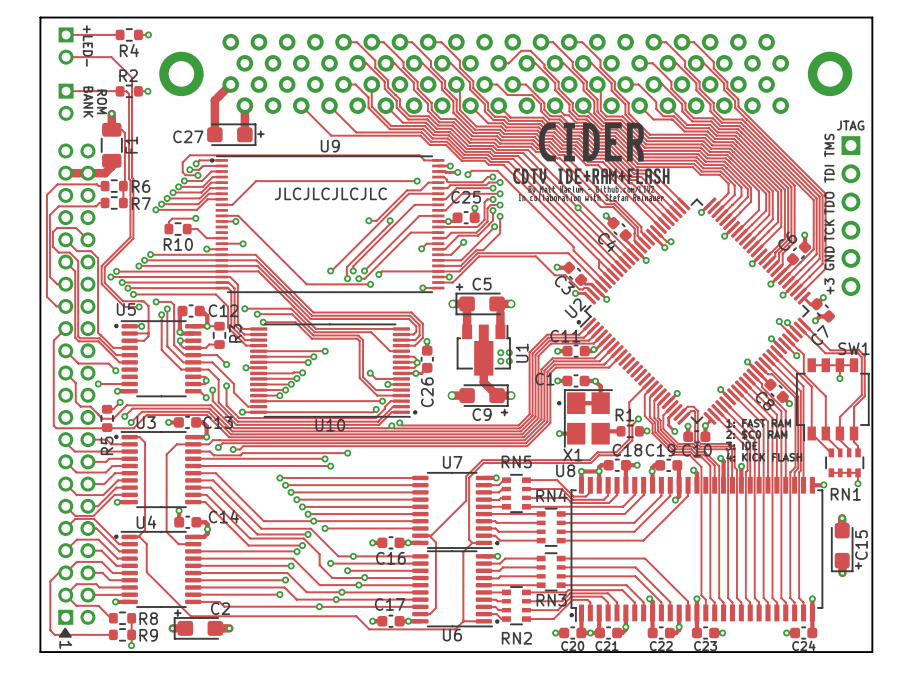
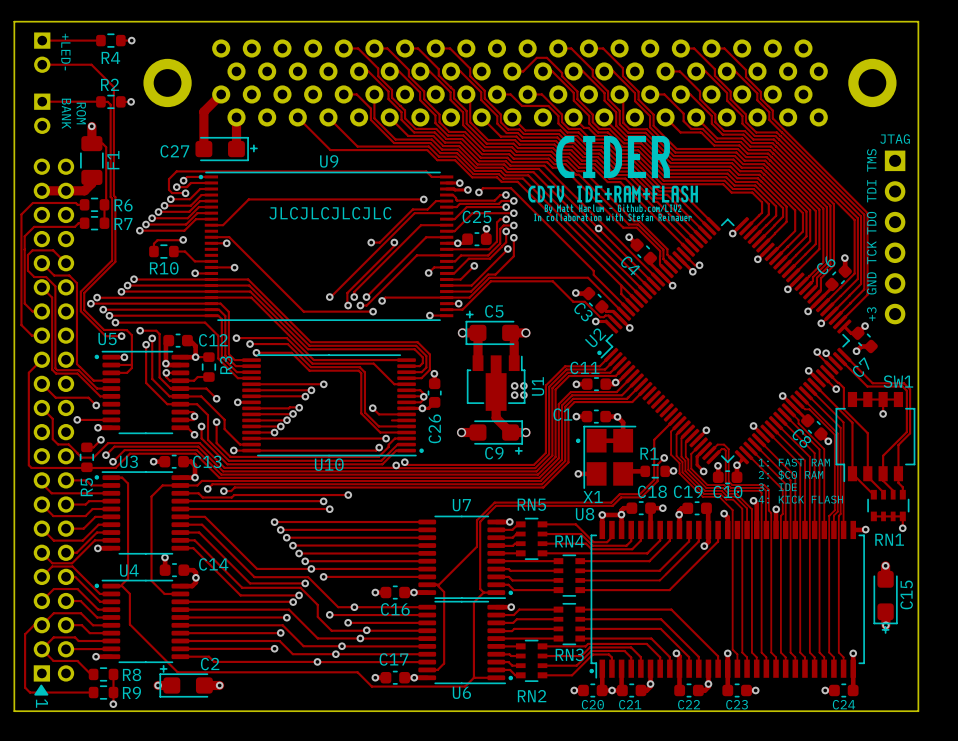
via: (387, 384) -> none
C15 footprint: [831, 522, 863, 572] -> [873, 570, 898, 634]

